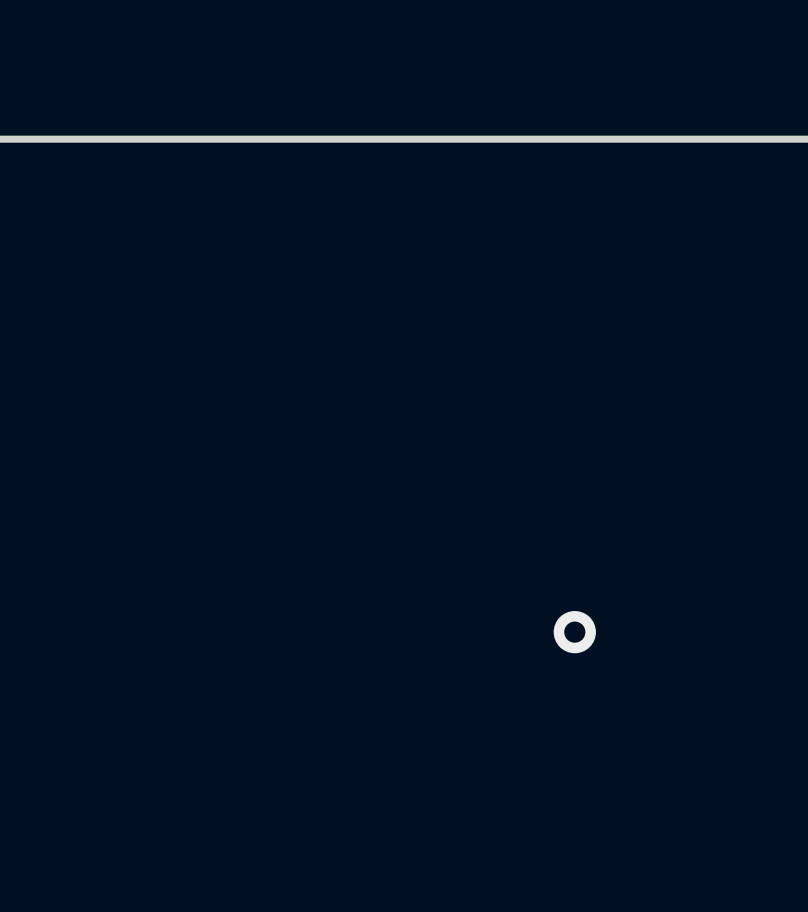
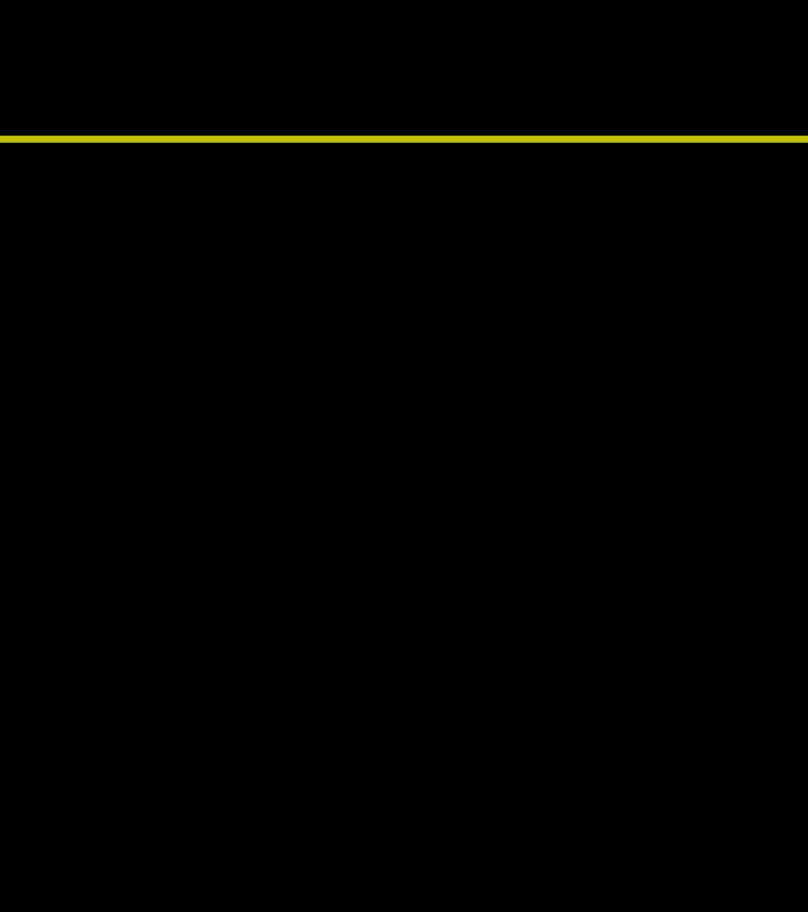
via: (574, 632) -> none

